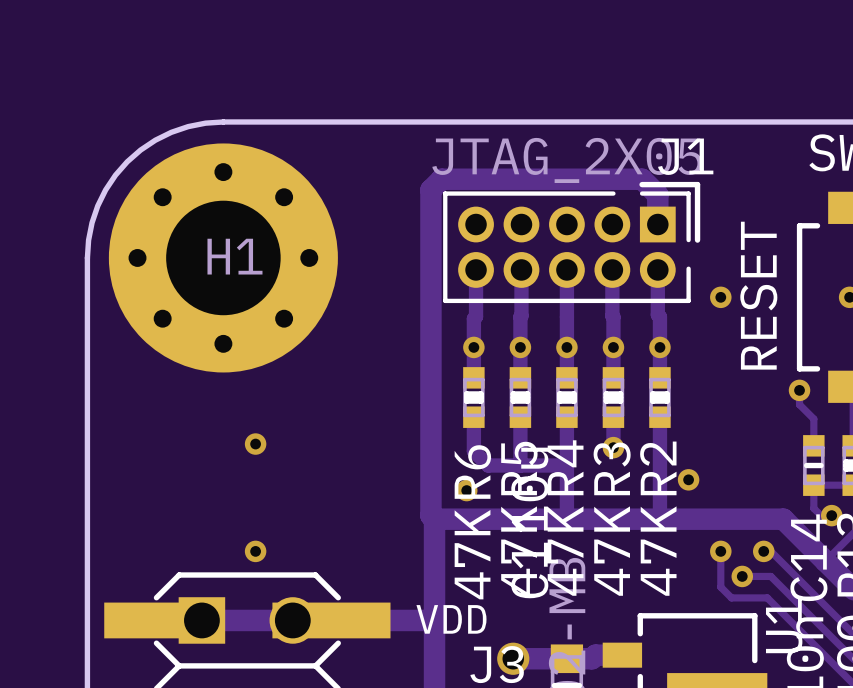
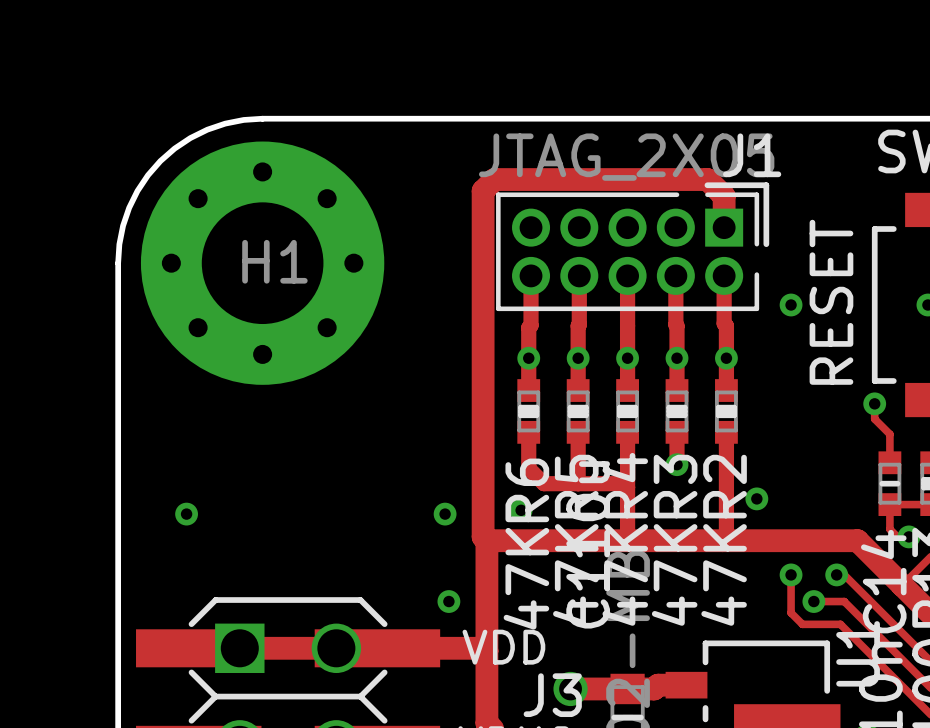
via: (255, 444) -> none
via: none -> (186, 514)
via: none -> (445, 514)
via: (255, 551) -> none
via: none -> (448, 601)

